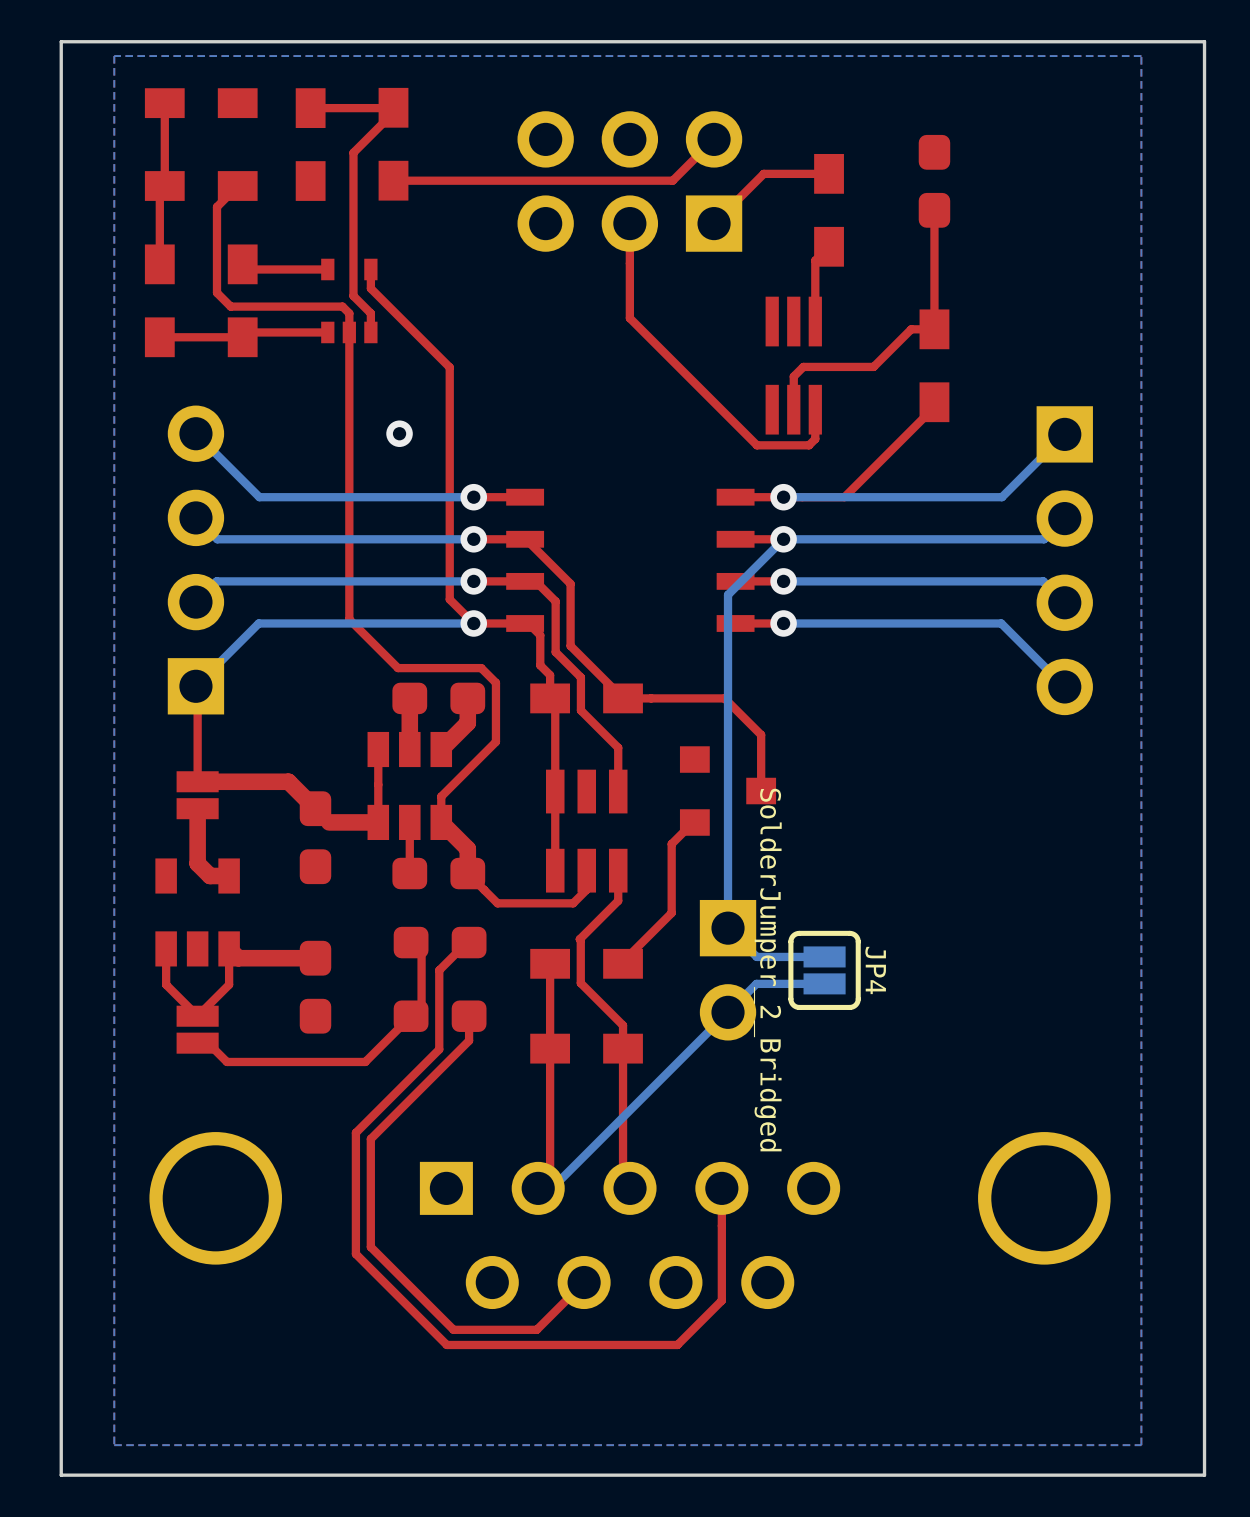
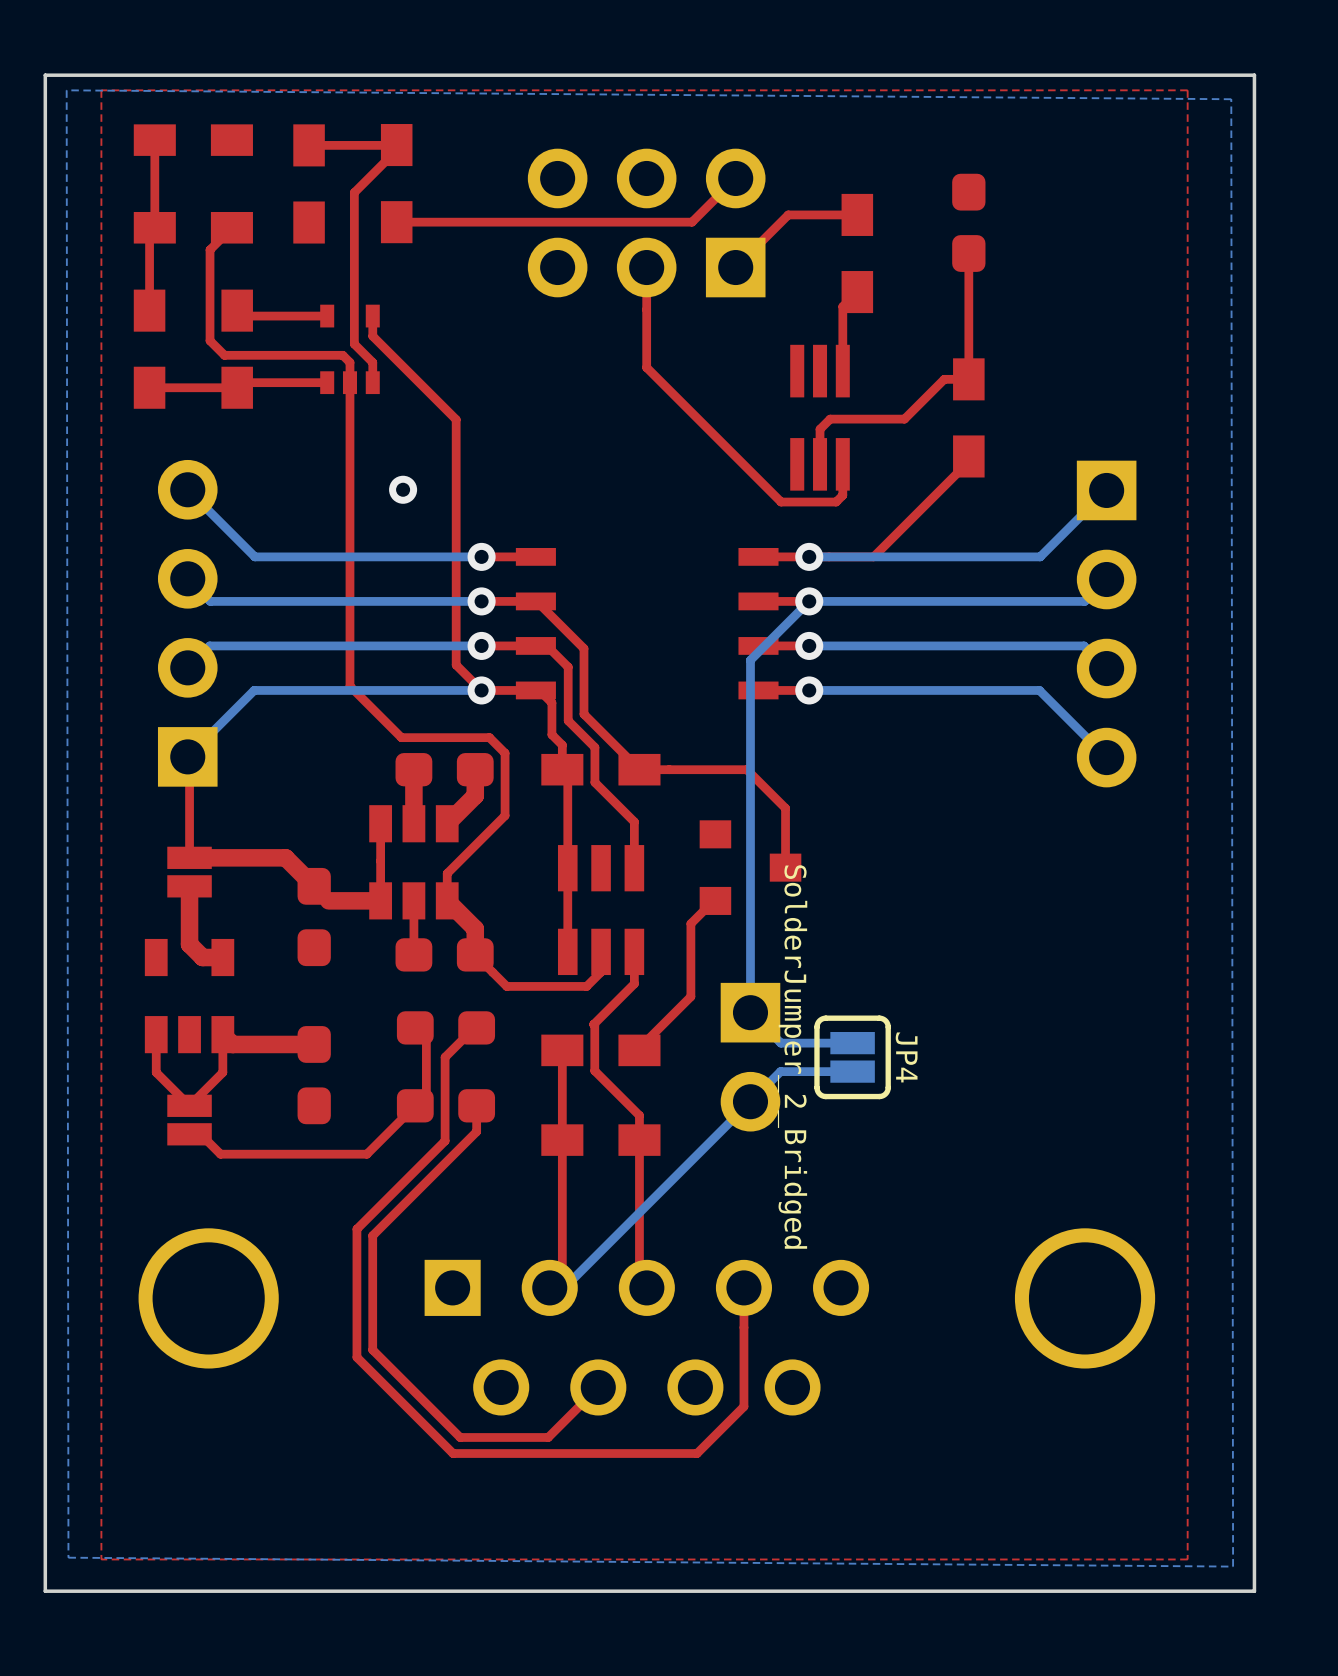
bottom zone outline: (1141, 56) (114, 56) (114, 1445) (1141, 1445) (1141, 56) -> (66, 90) (1231, 99) (1233, 1566) (68, 1557) (66, 90)

